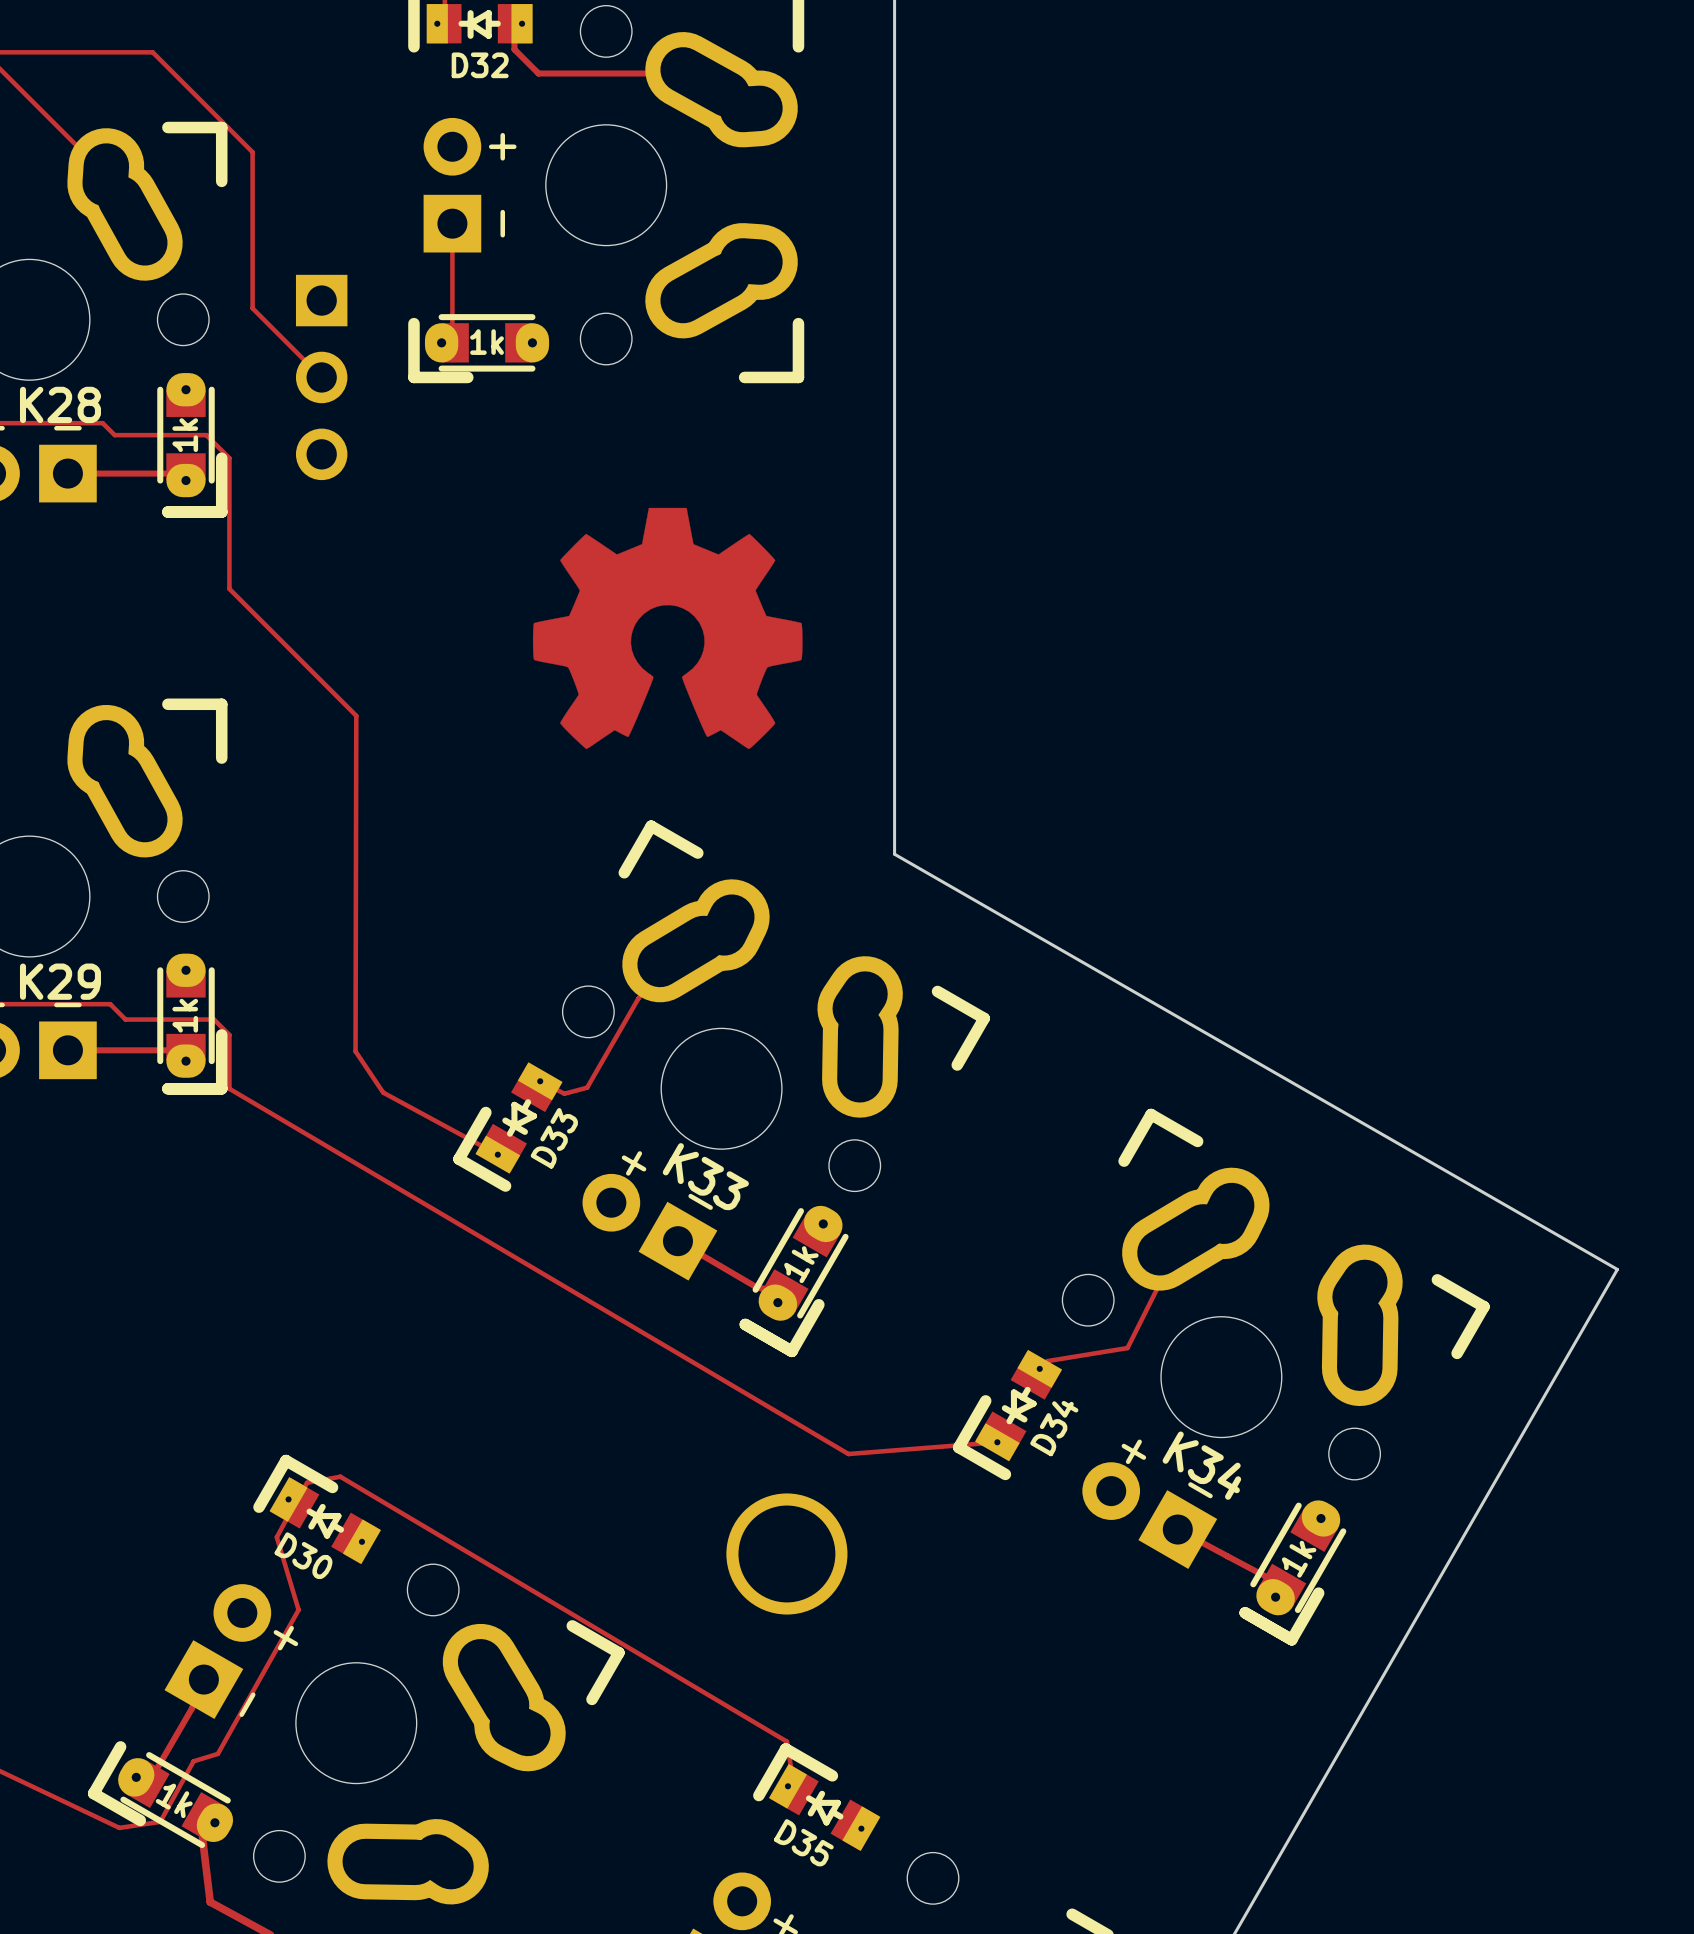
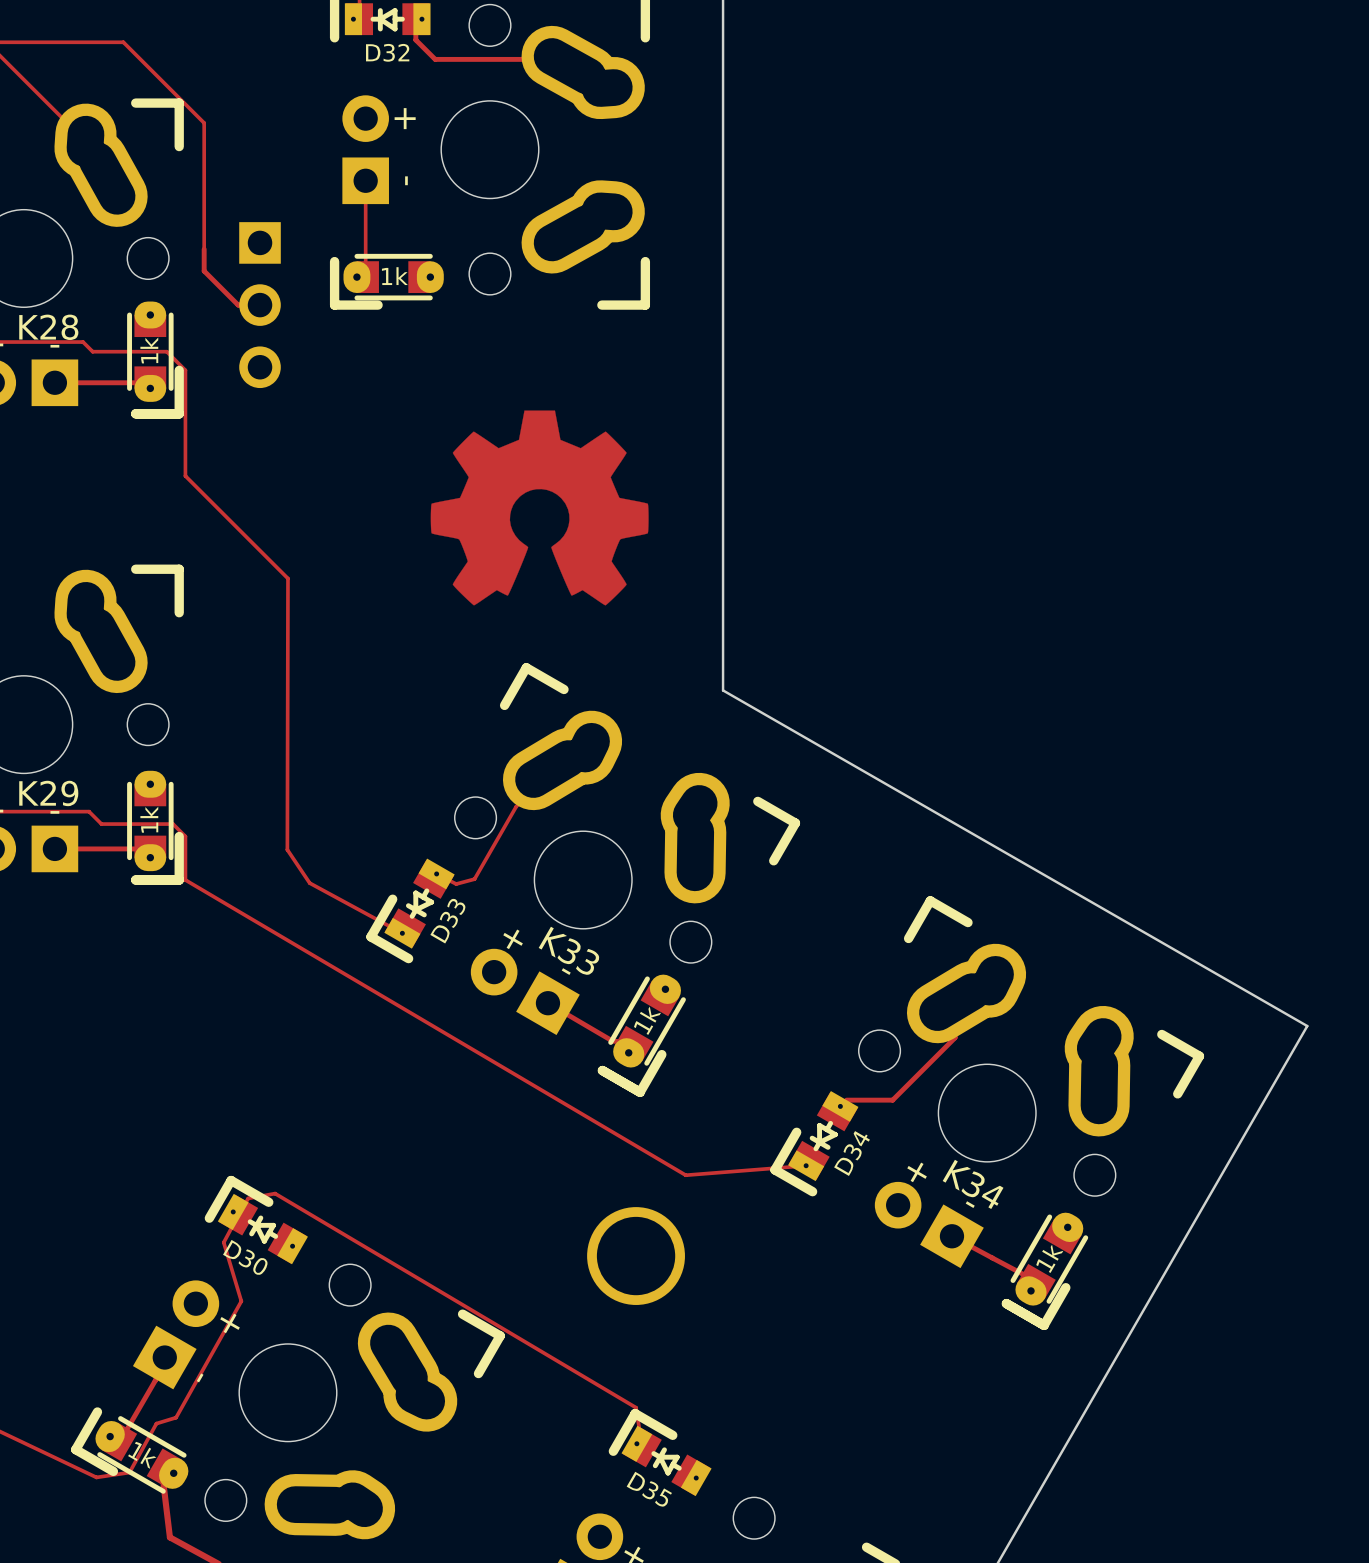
track: (252, 308) (321, 377) -> (204, 249) (204, 271) (238, 305) (260, 305)
track: (1181, 1239) (1127, 1348) (1047, 1361) -> (955, 1002) (955, 1037) (892, 1100) (846, 1100)

